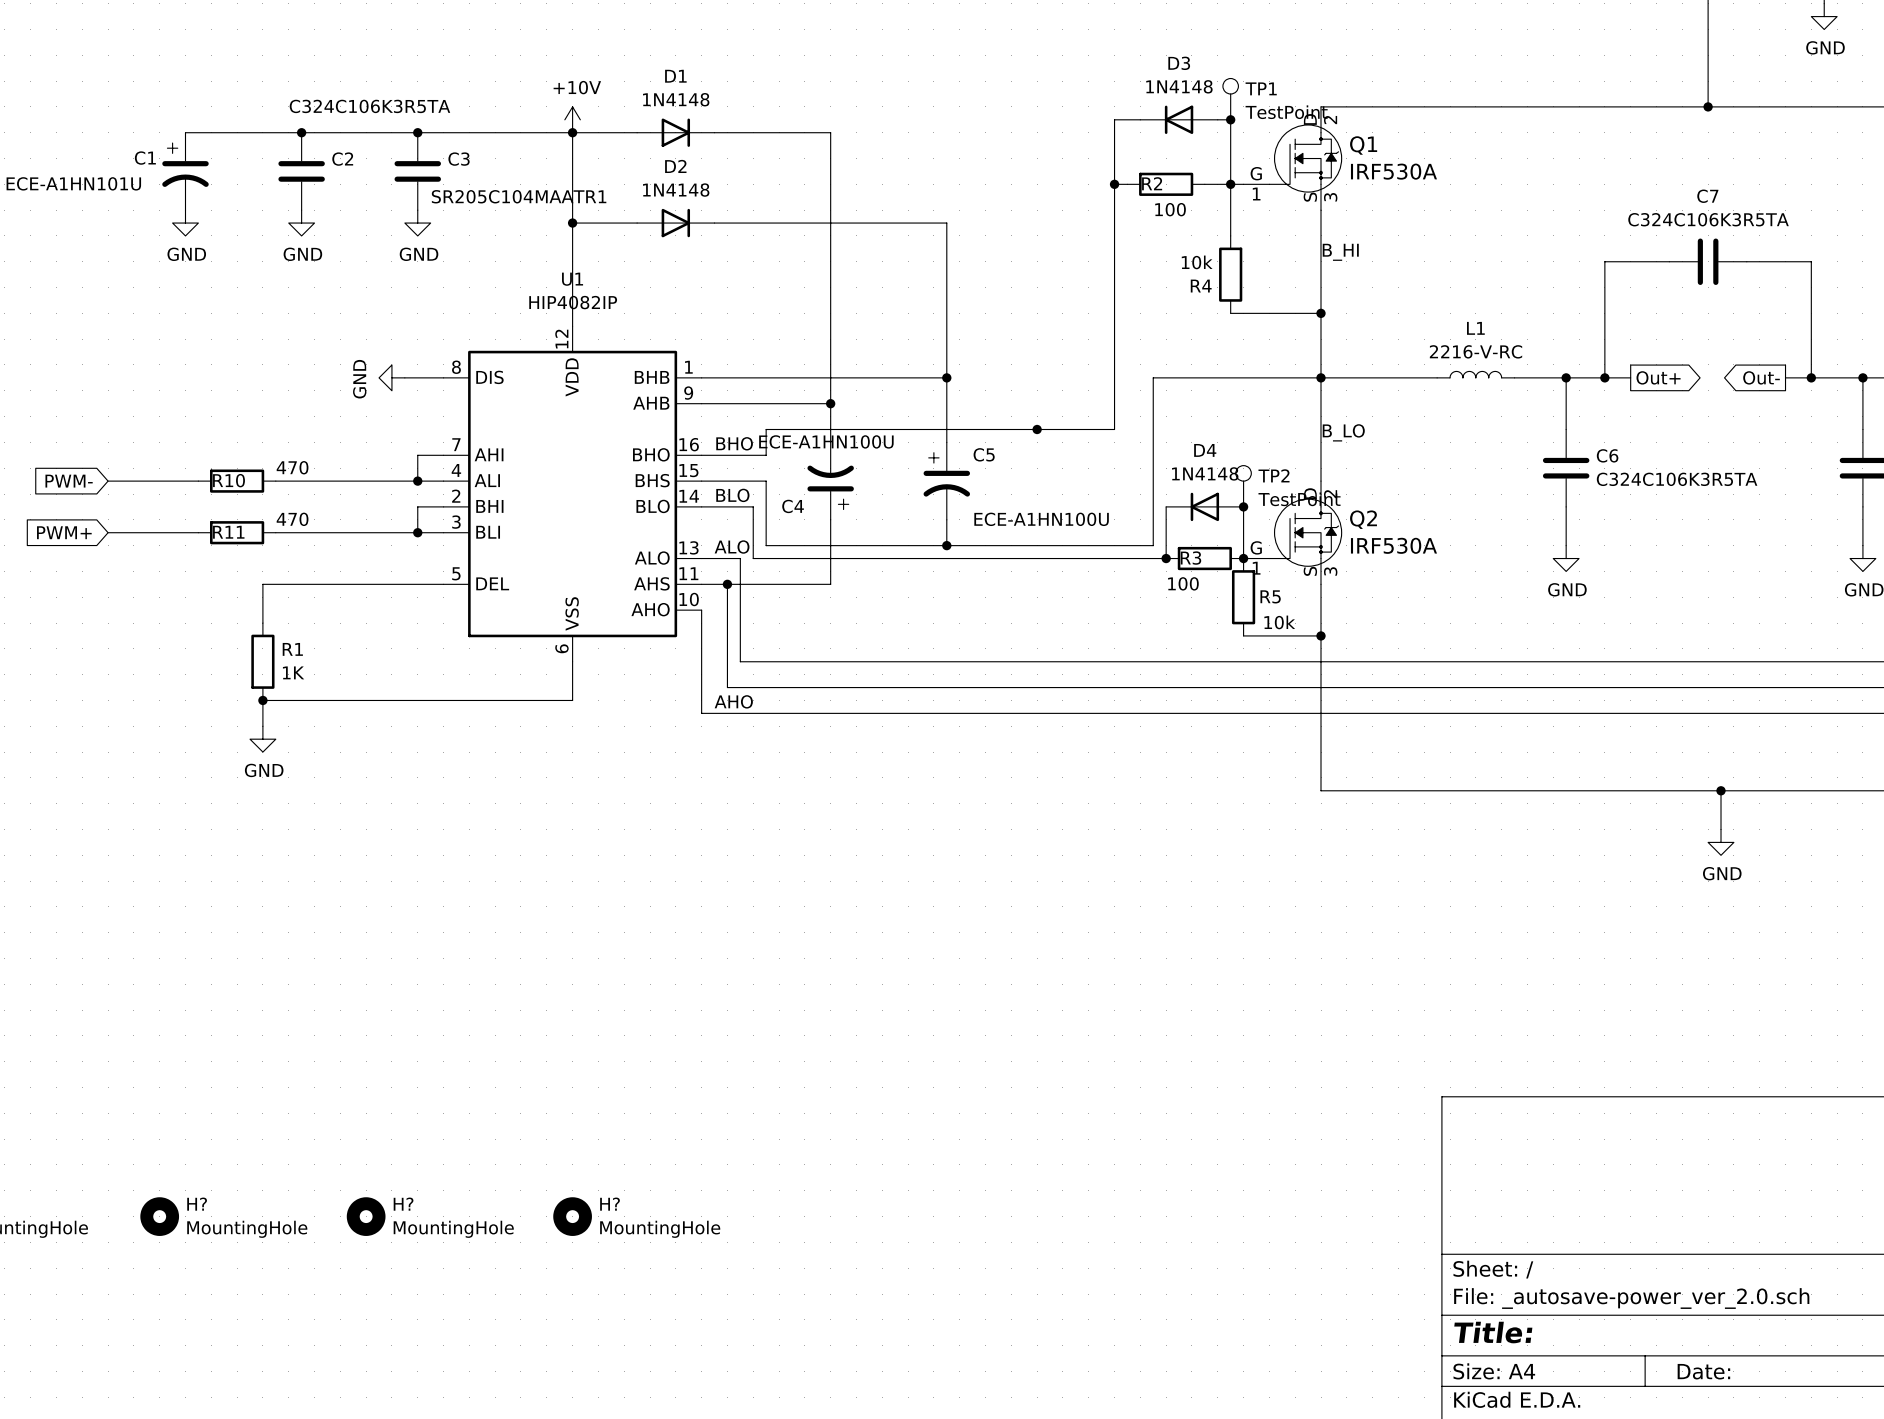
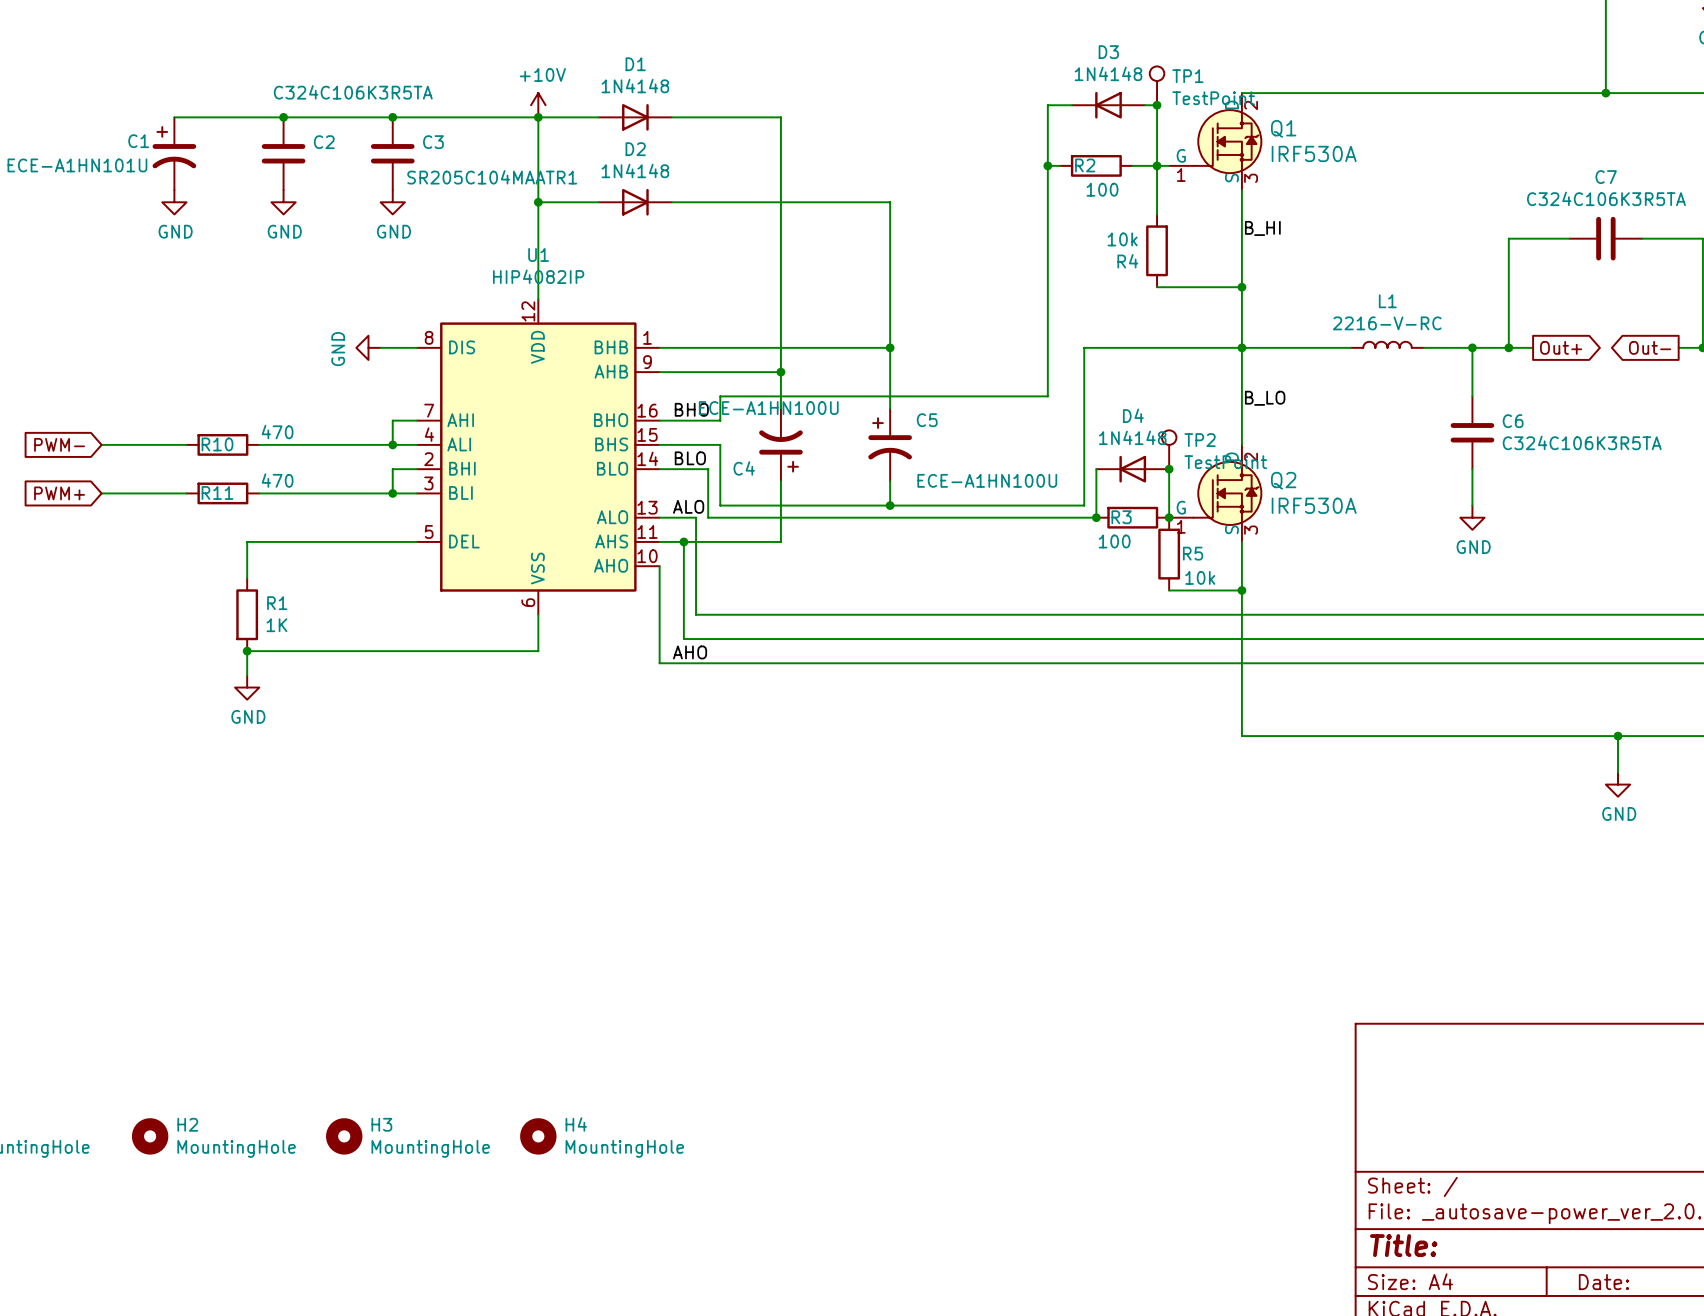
junction: (1037, 429) -> none
H? name: H? (197, 1204) -> H2 (187, 1124)
H? name: H? (403, 1204) -> H3 (381, 1124)
H? name: H? (610, 1204) -> H4 (576, 1124)

